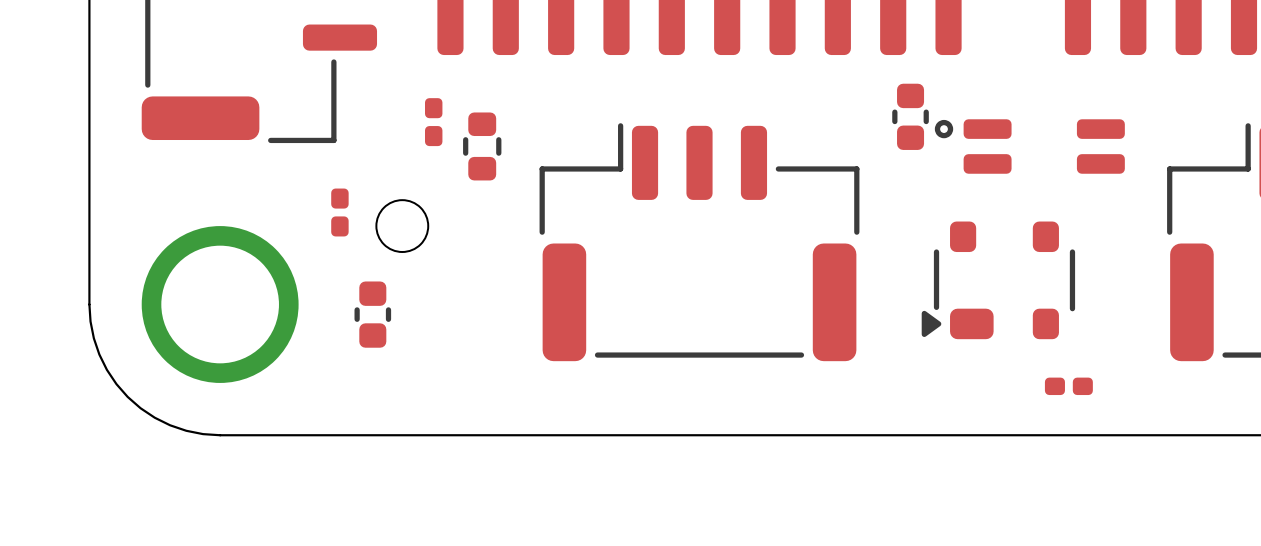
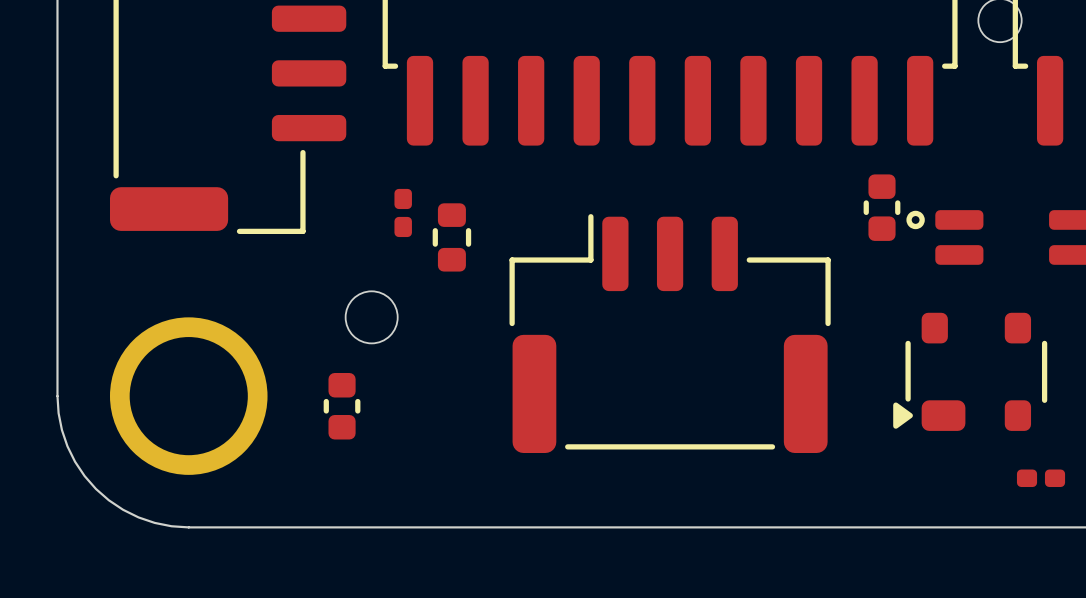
part: (339, 212) -> none

